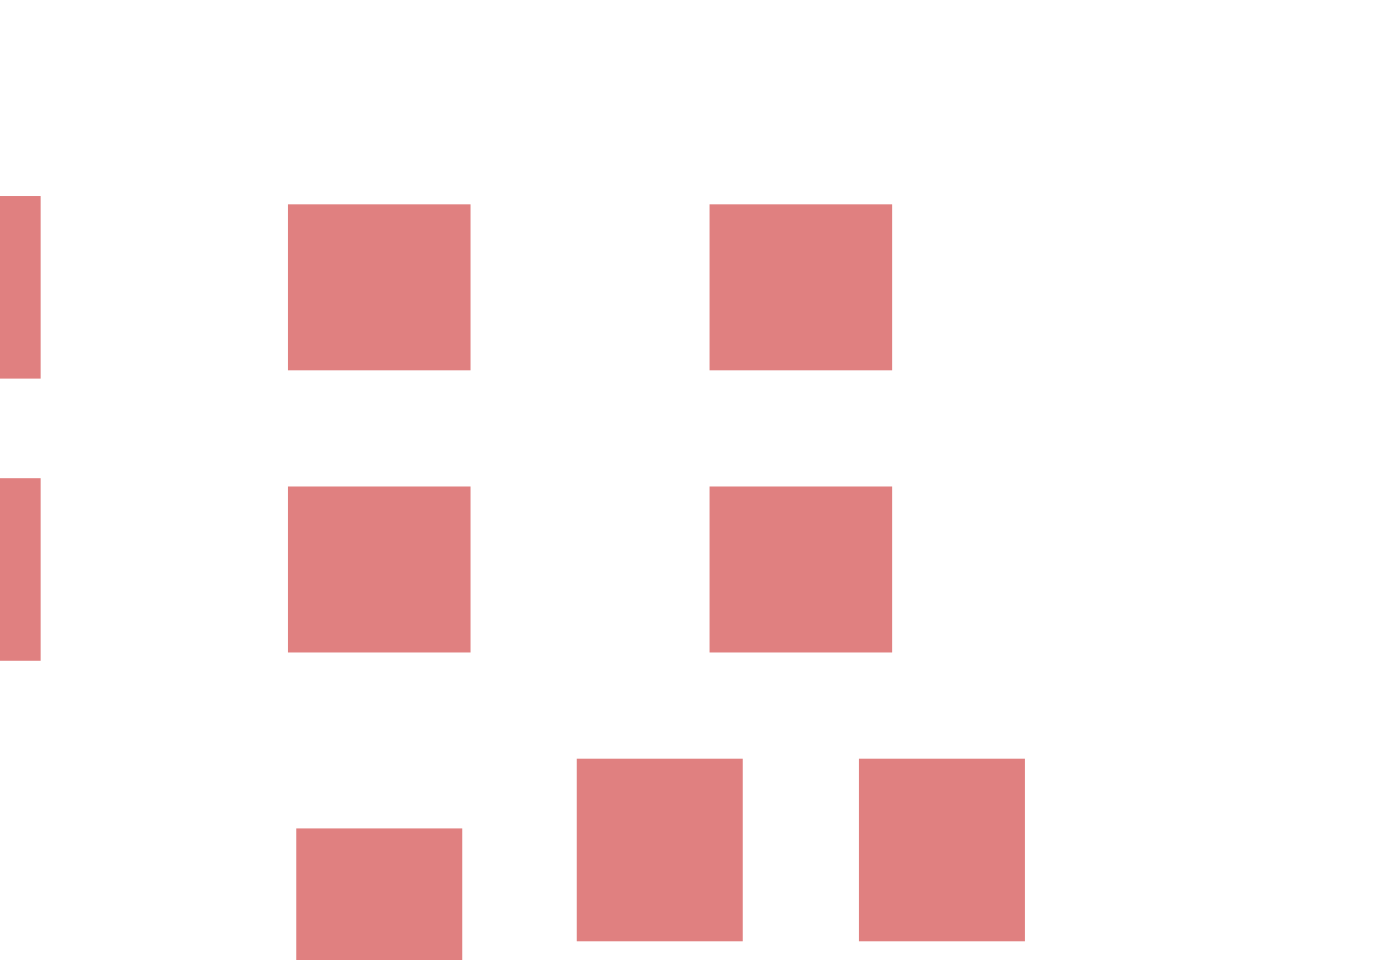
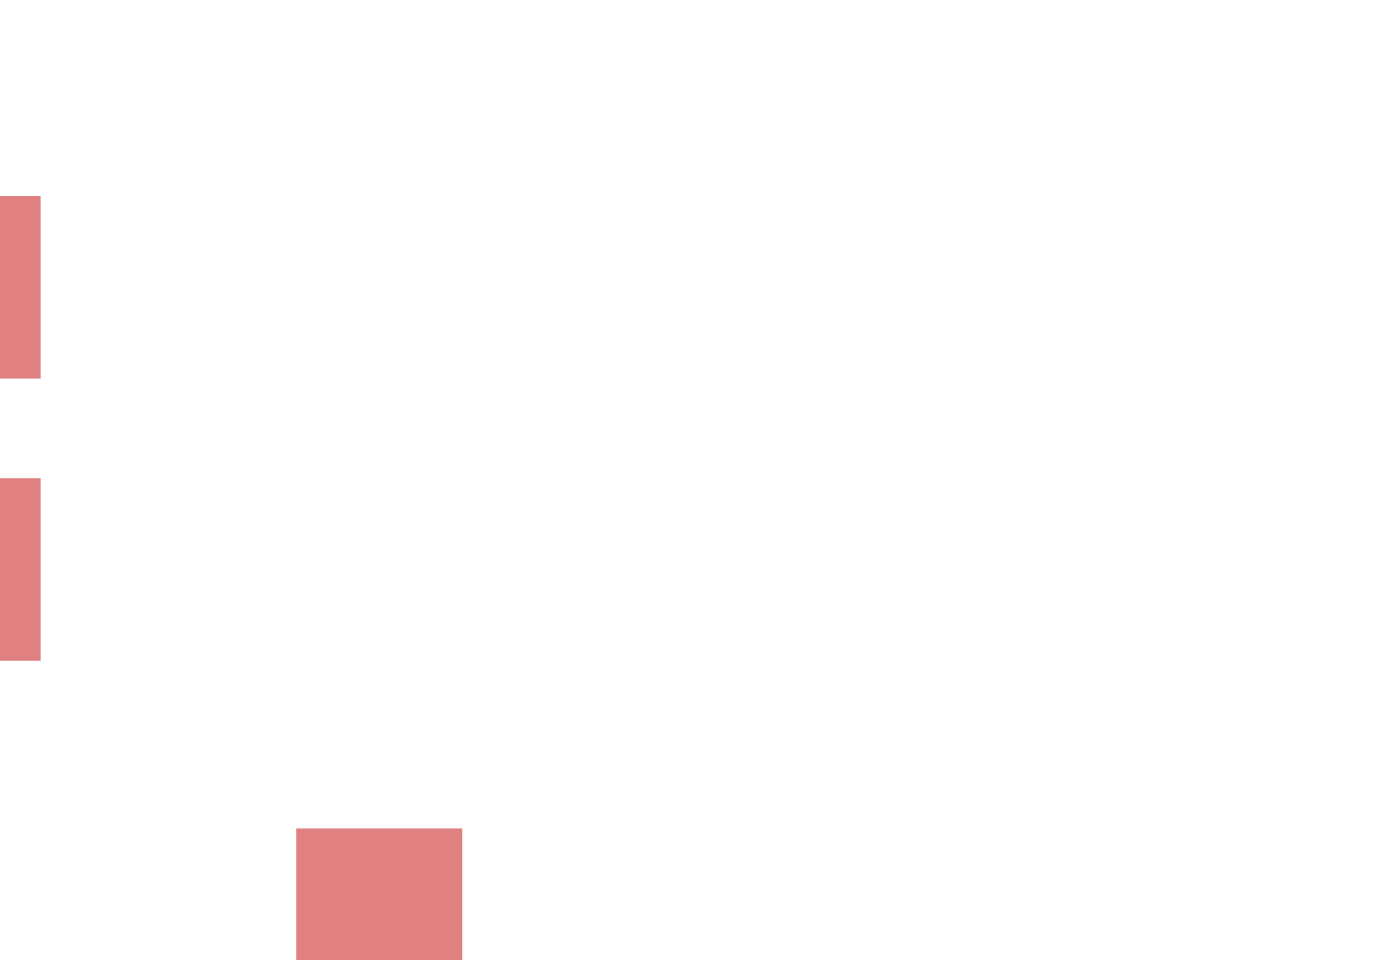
part: (379, 428) -> none
part: (800, 428) -> none
part: (800, 849) -> none

